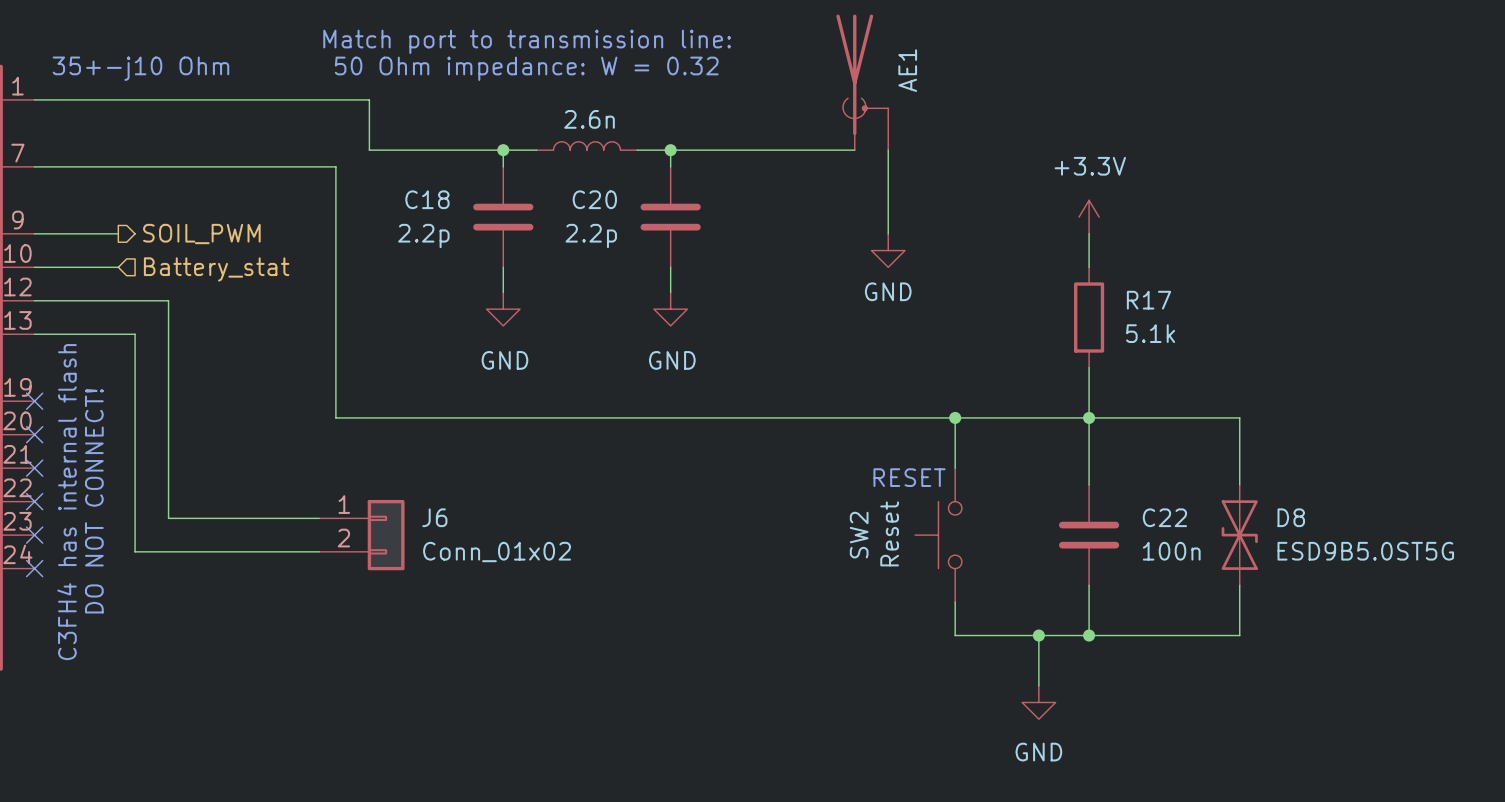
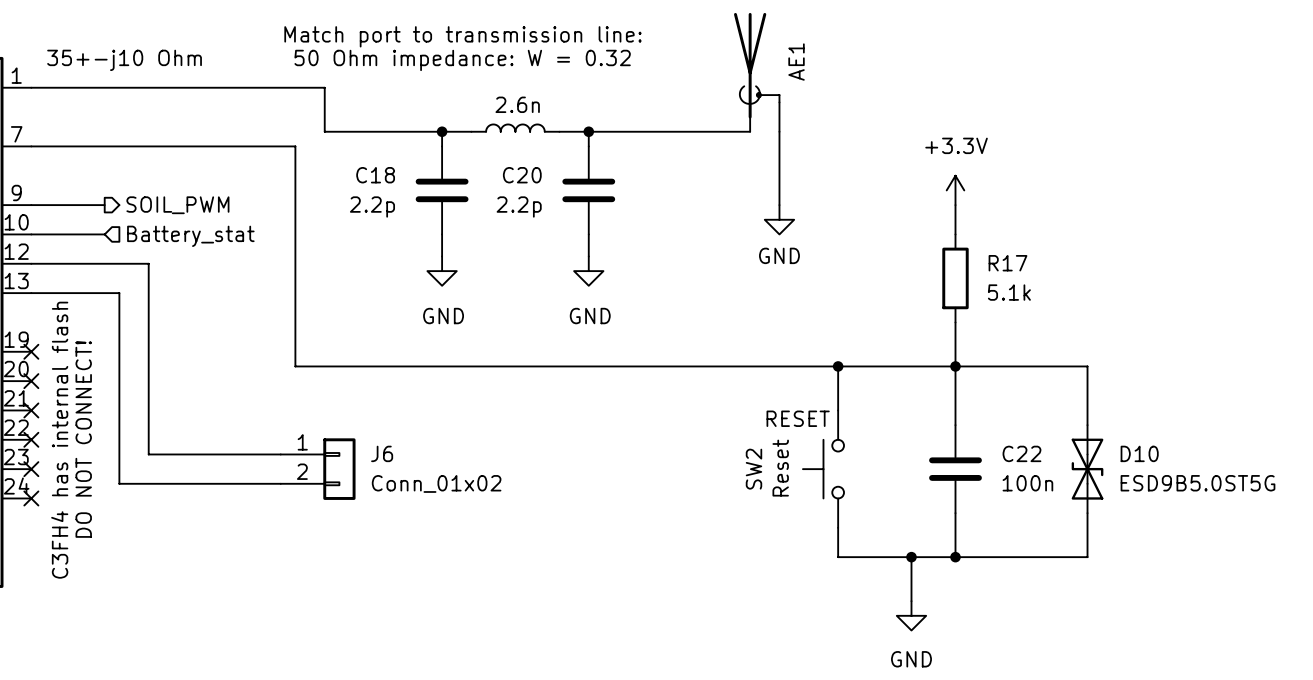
D8 name: D8 (1291, 517) -> D10 (1139, 453)

